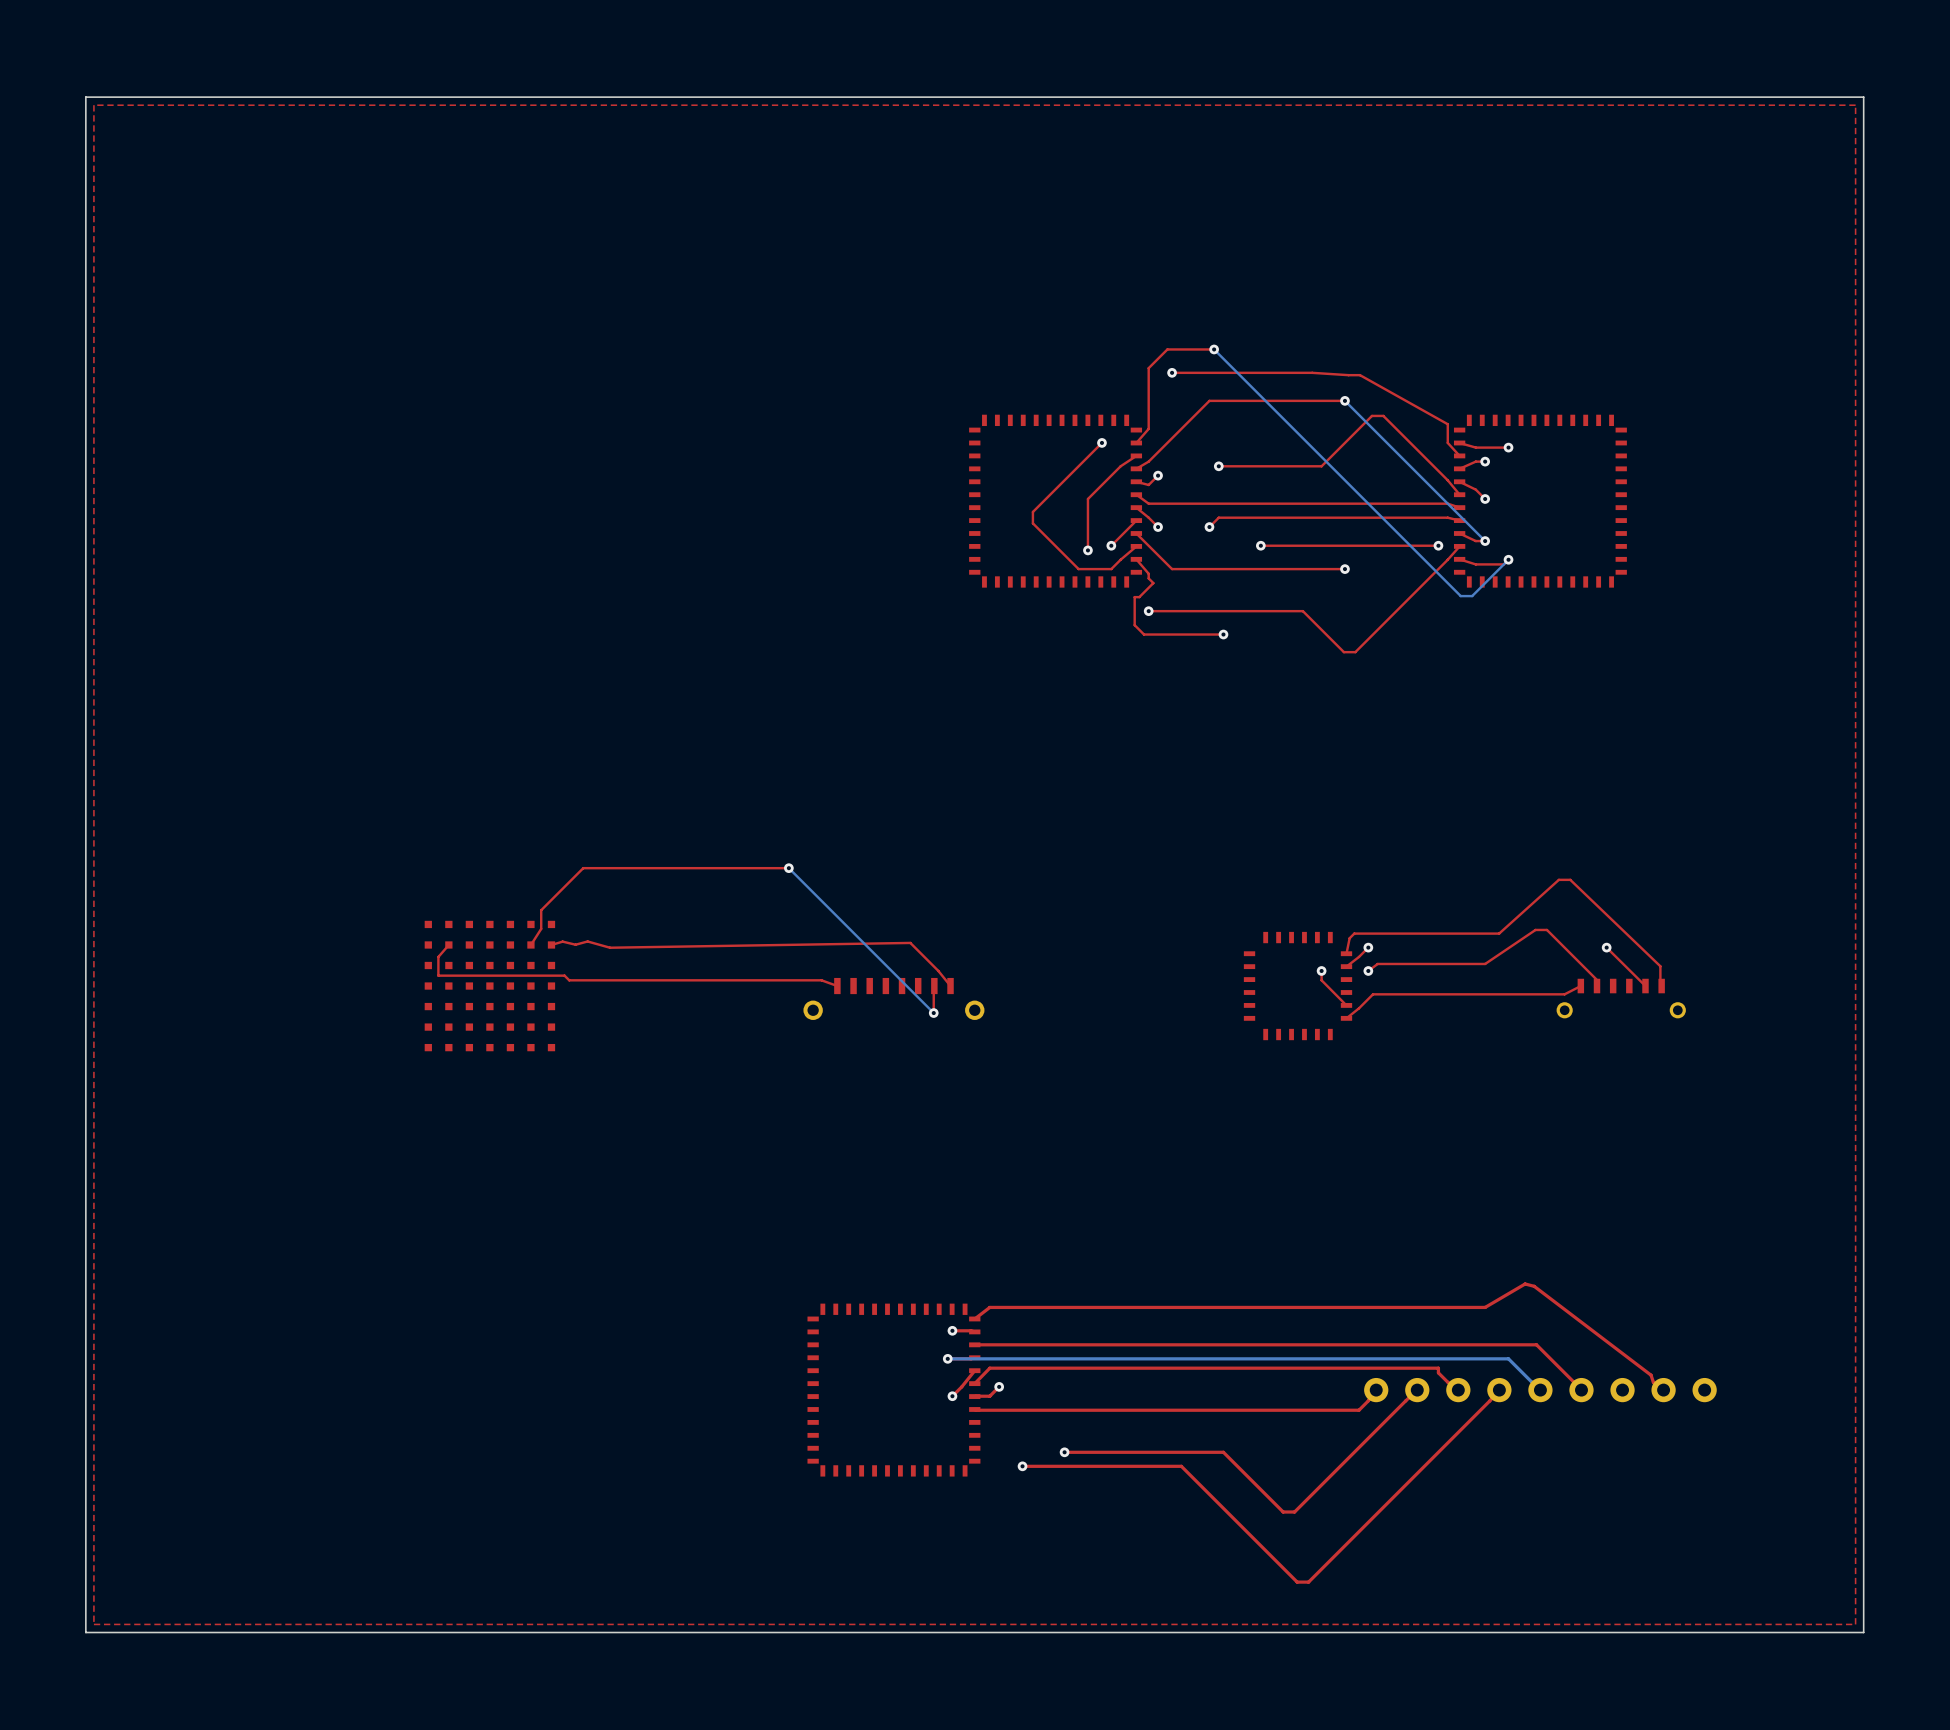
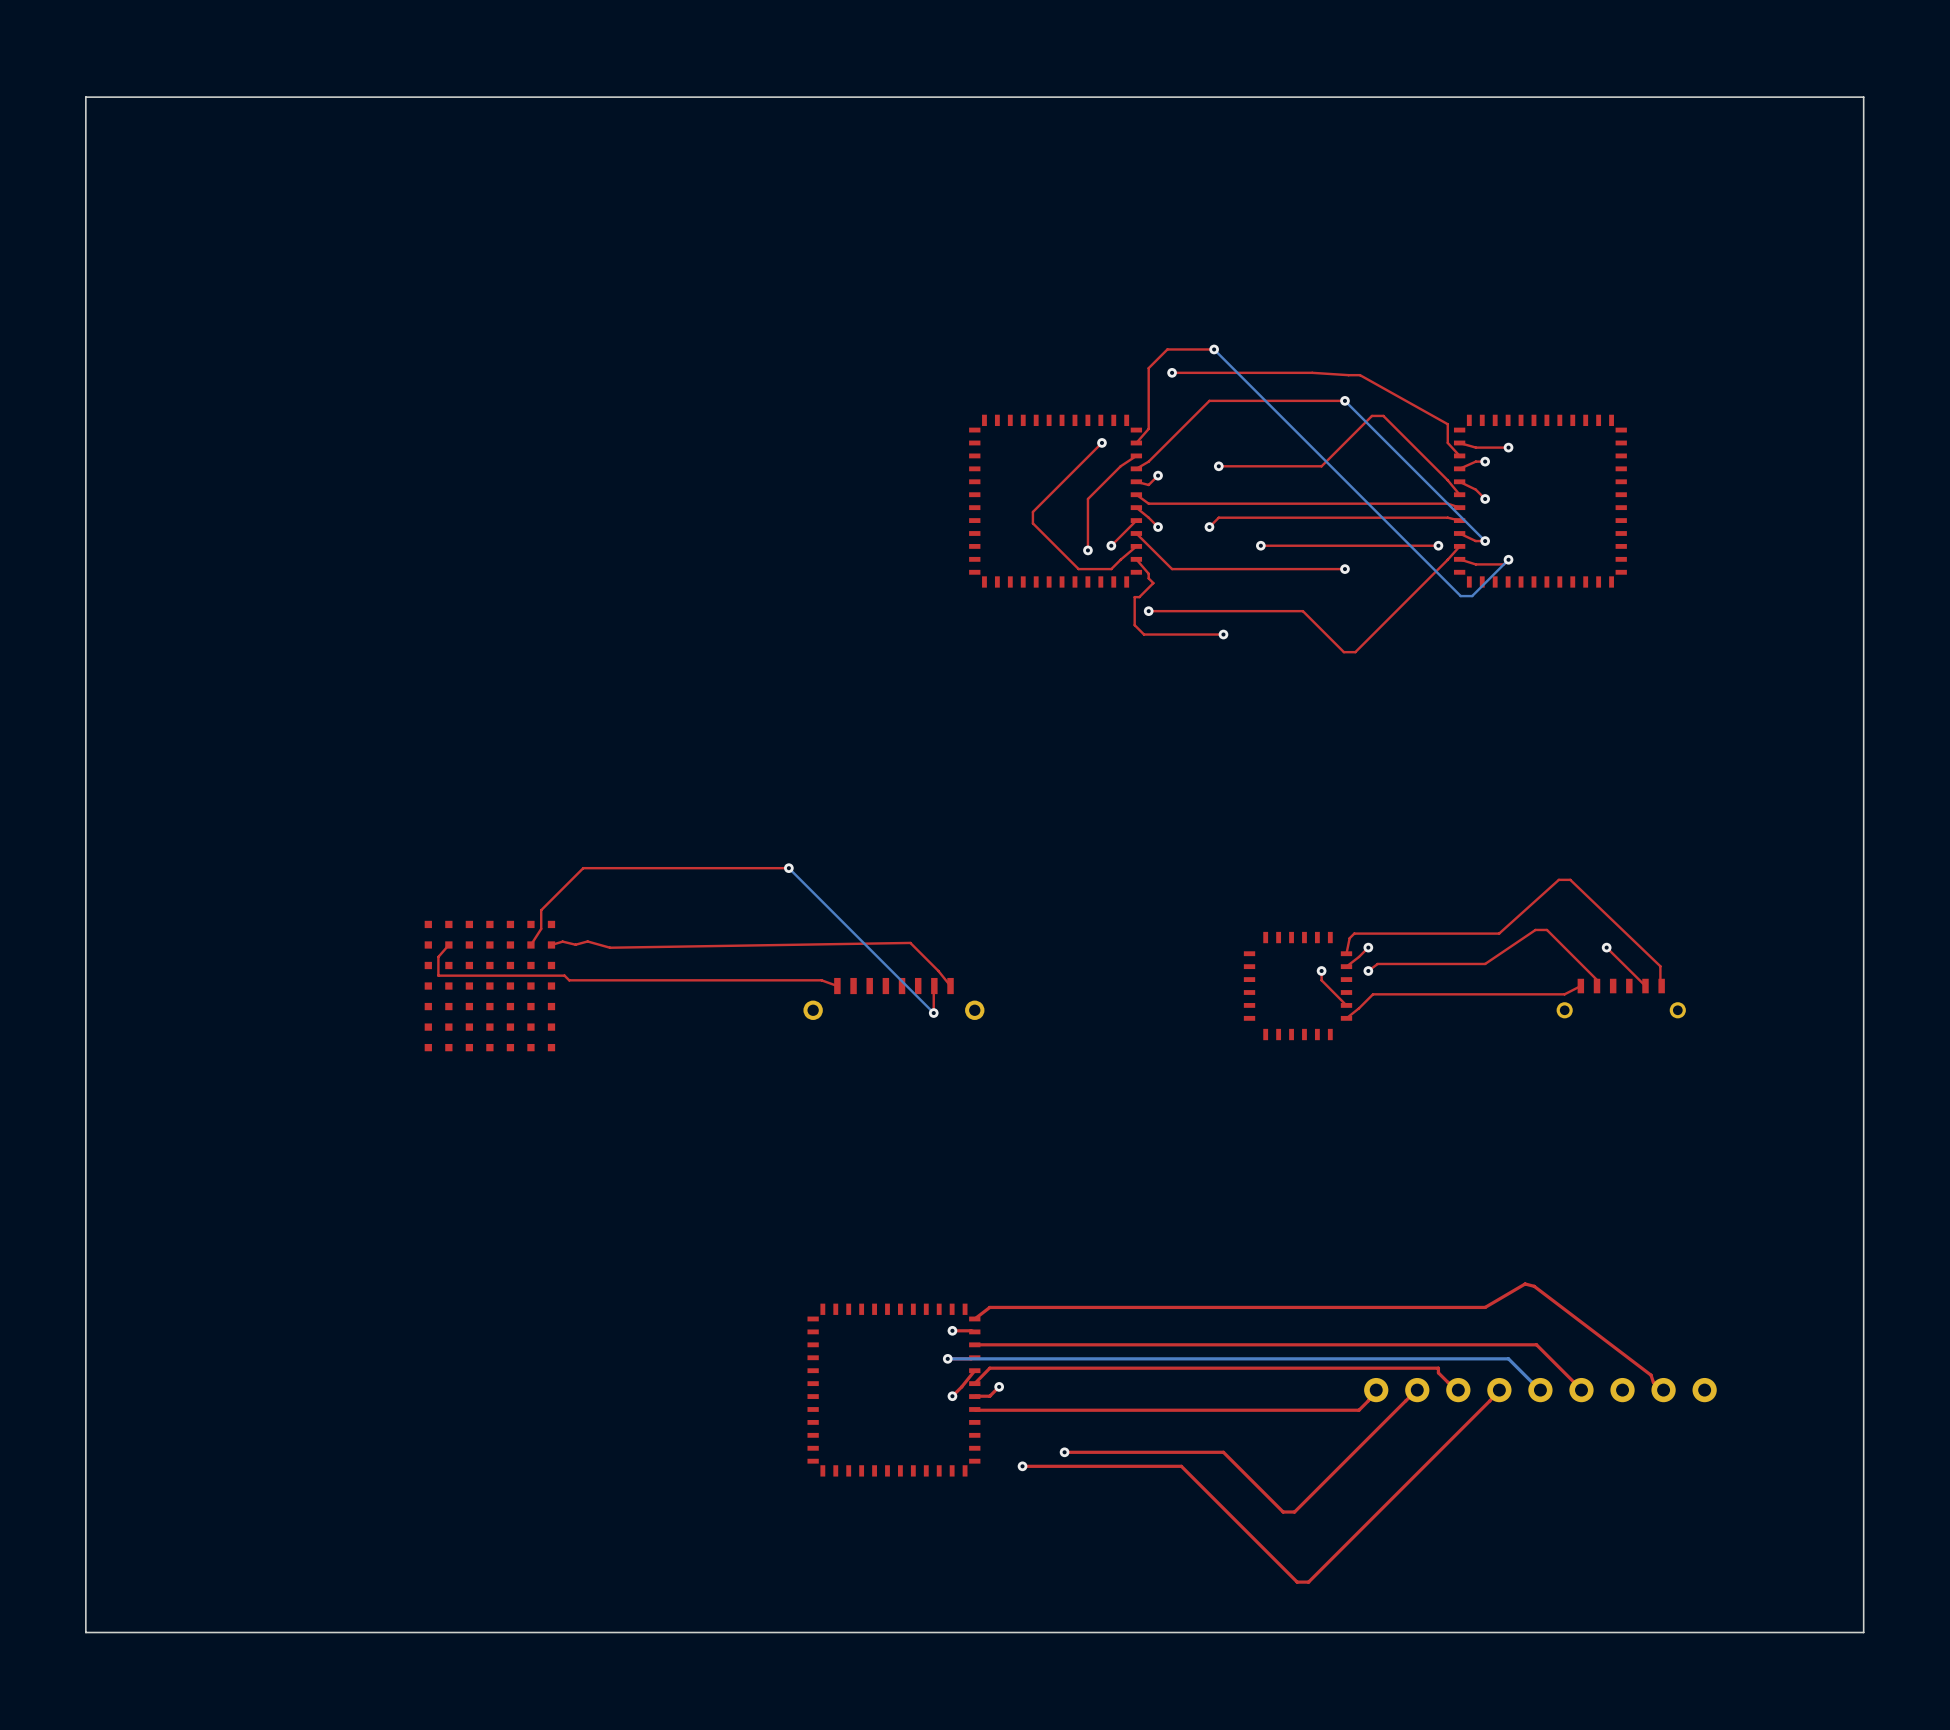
top zone outline: (1855, 105) (93, 105) (93, 1624) (1855, 1624) (1855, 105) -> none

